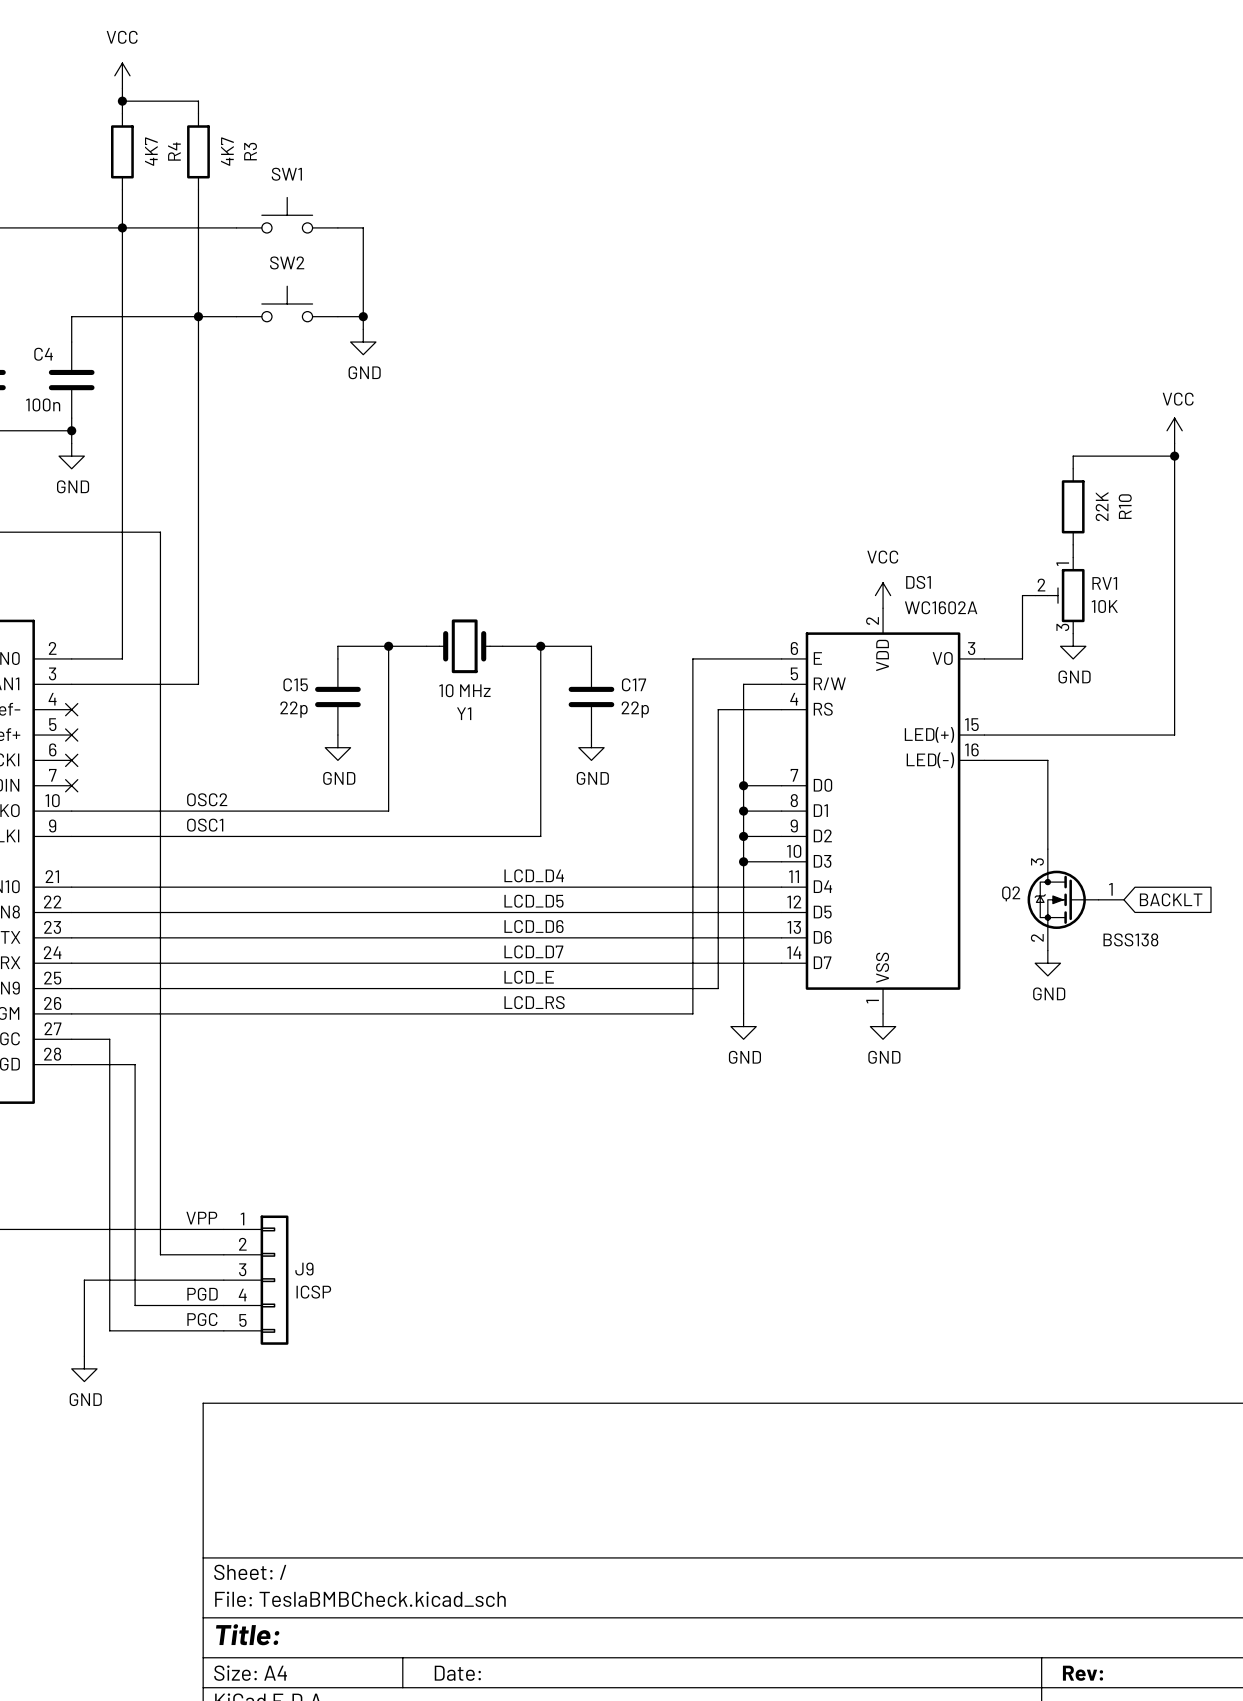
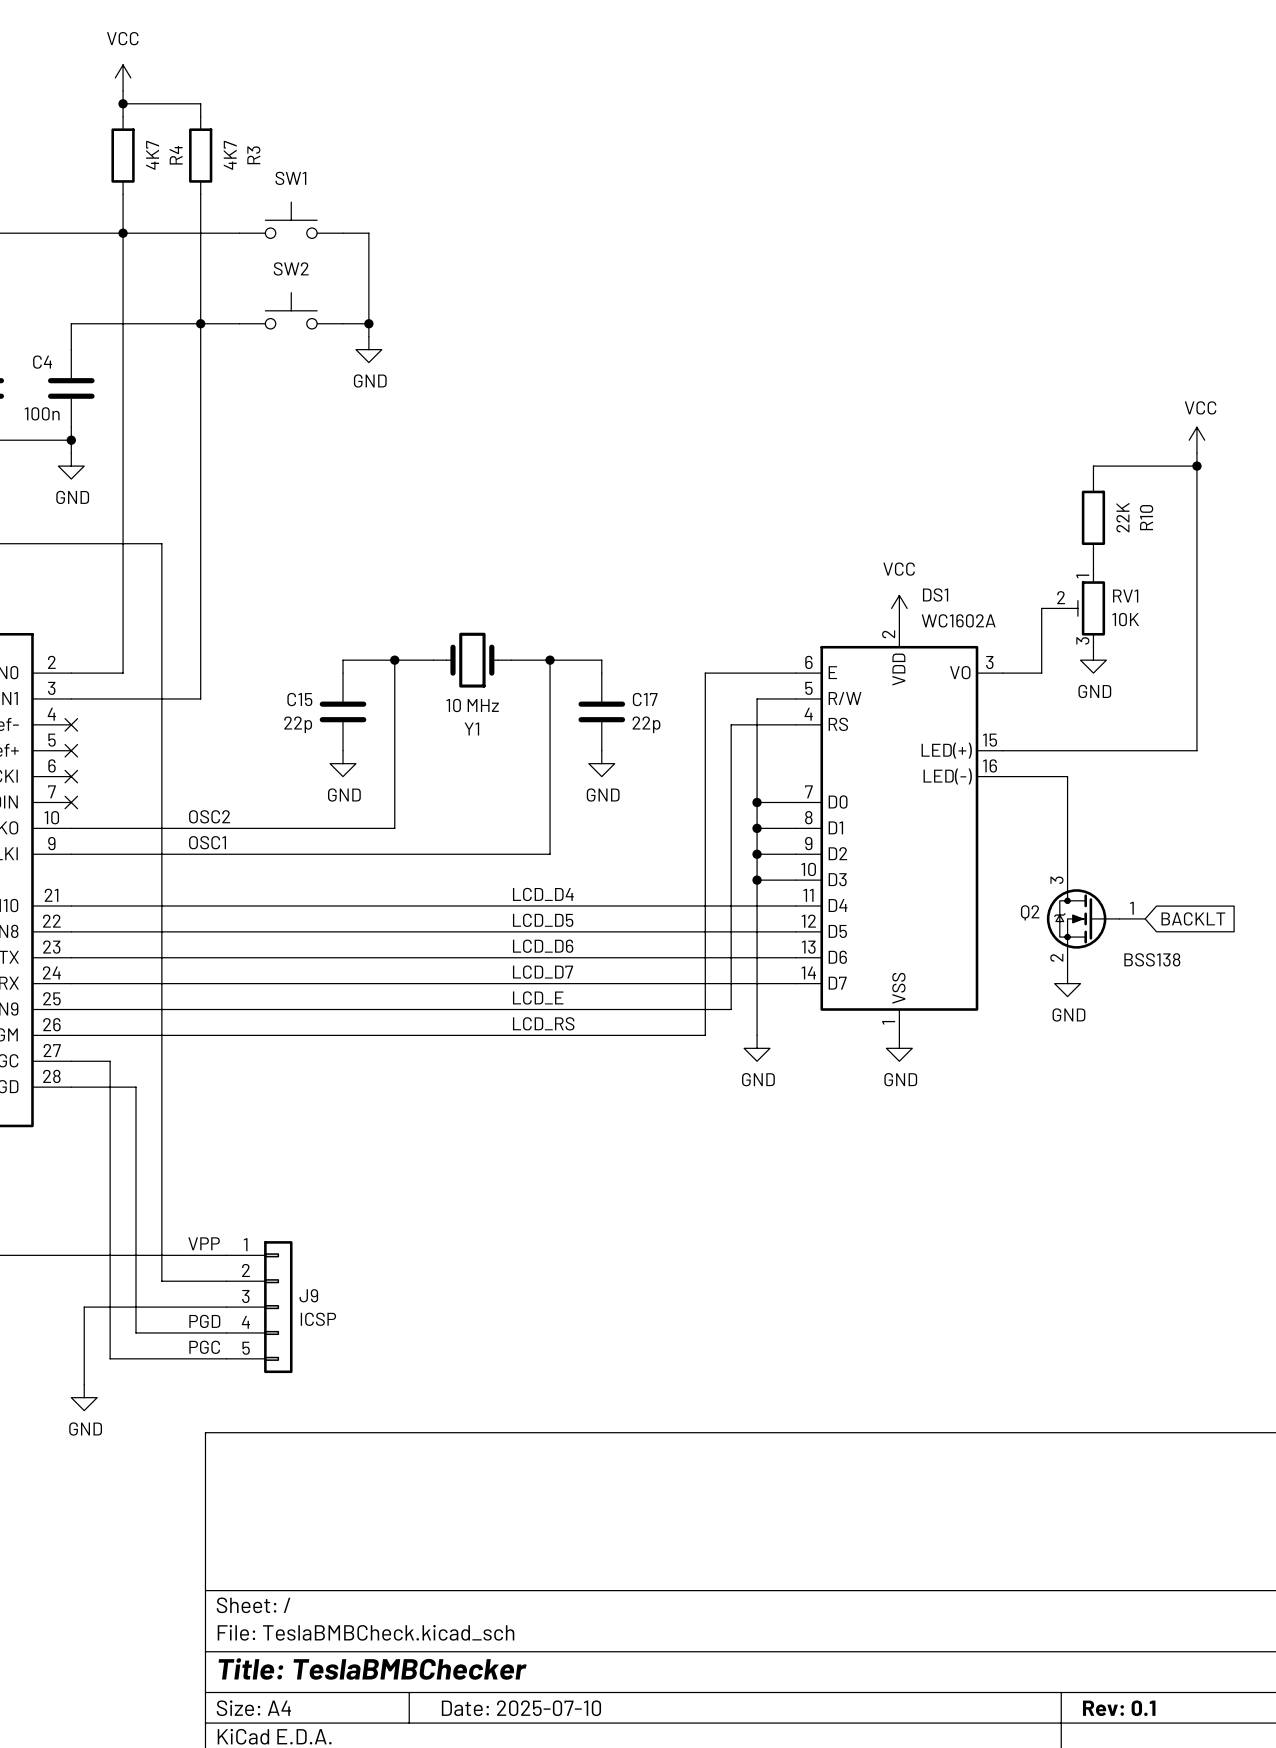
title block: Title: (247, 1634) -> Title: TeslaBMBChecker (372, 1669)
title block: Date: (457, 1673) -> Date: 2025-07-10 (521, 1708)
title block: Rev: (1083, 1673) -> Rev: 0.1 (1119, 1708)

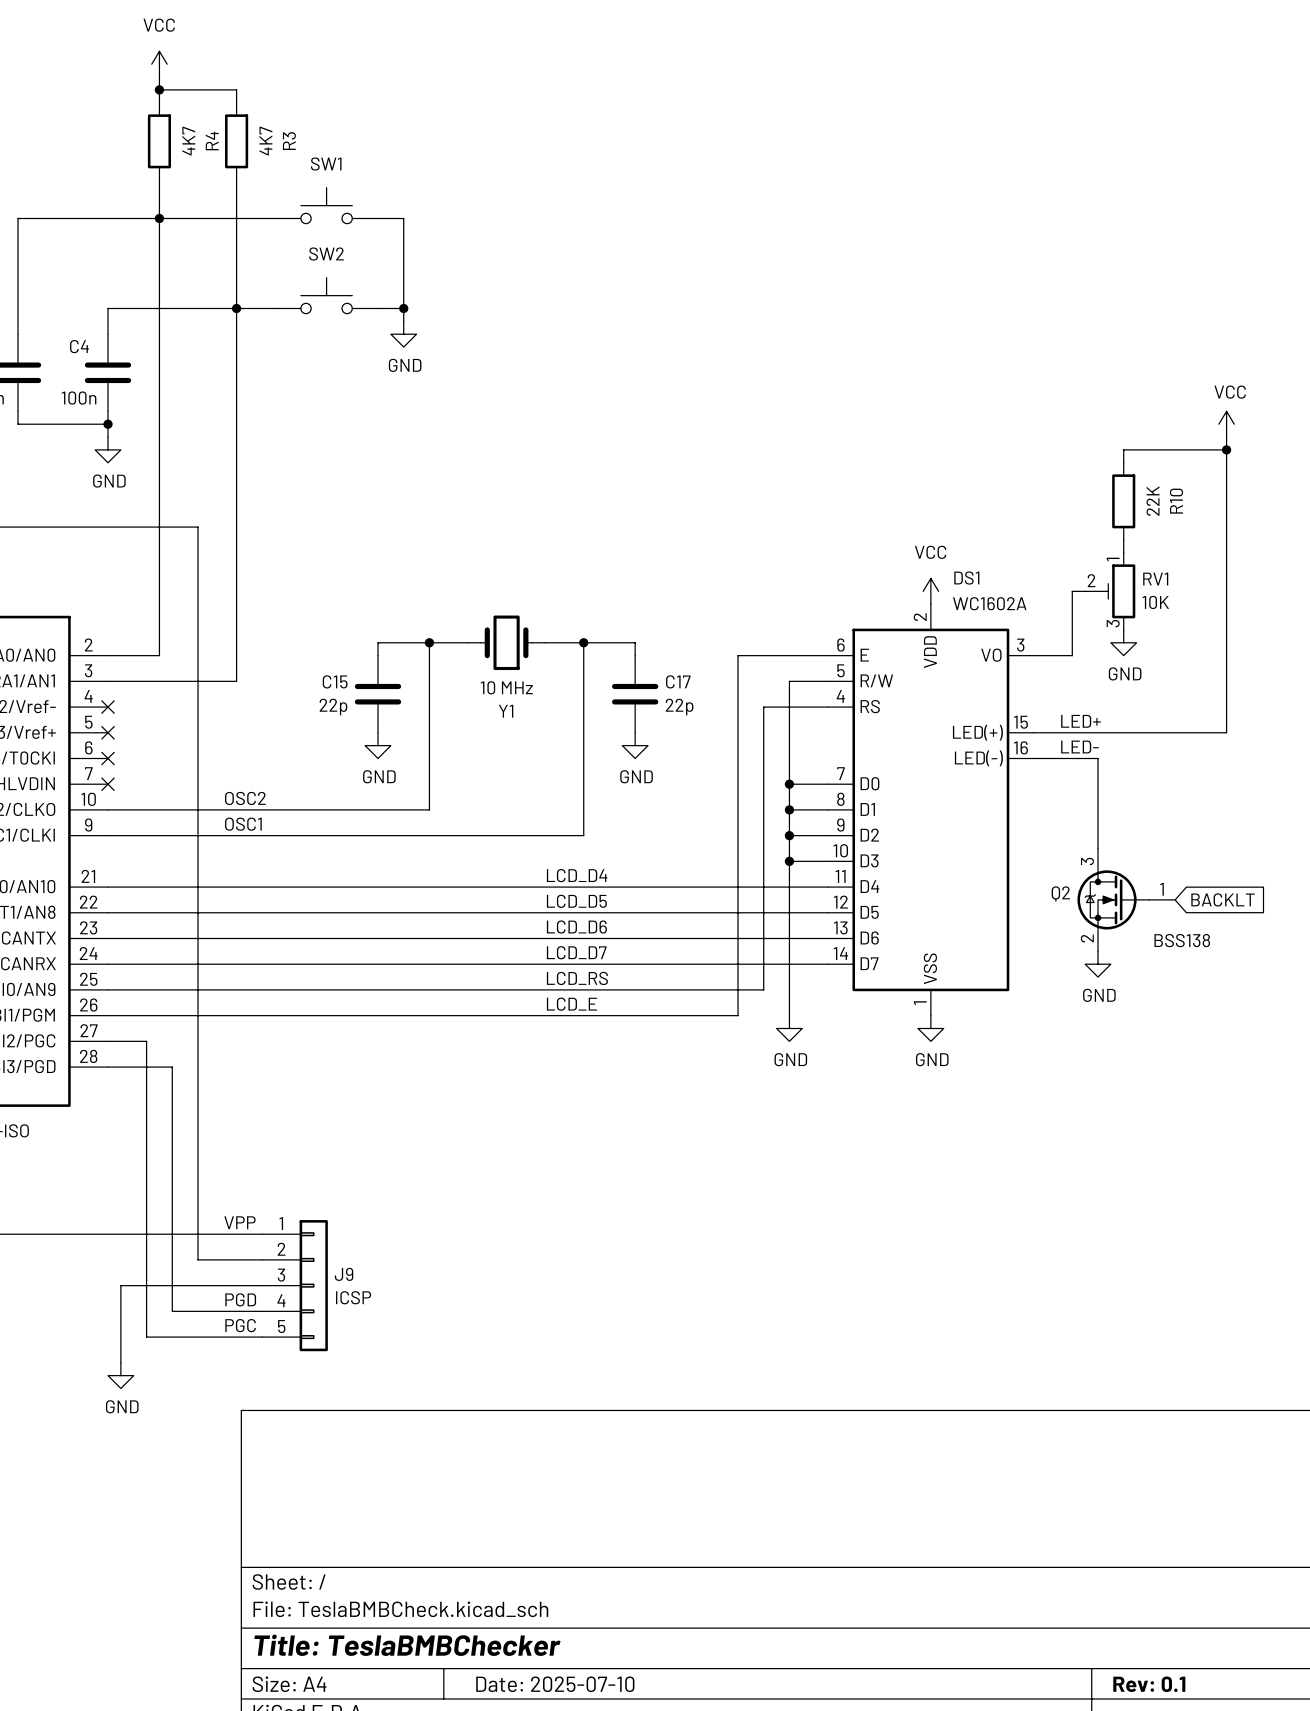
label: none -> LED+ (1080, 721)
label: none -> LED- (1080, 747)
label: LCD_E (538, 997) -> LCD_RS (577, 978)
label: LCD_RS (543, 1023) -> LCD_E (571, 1004)

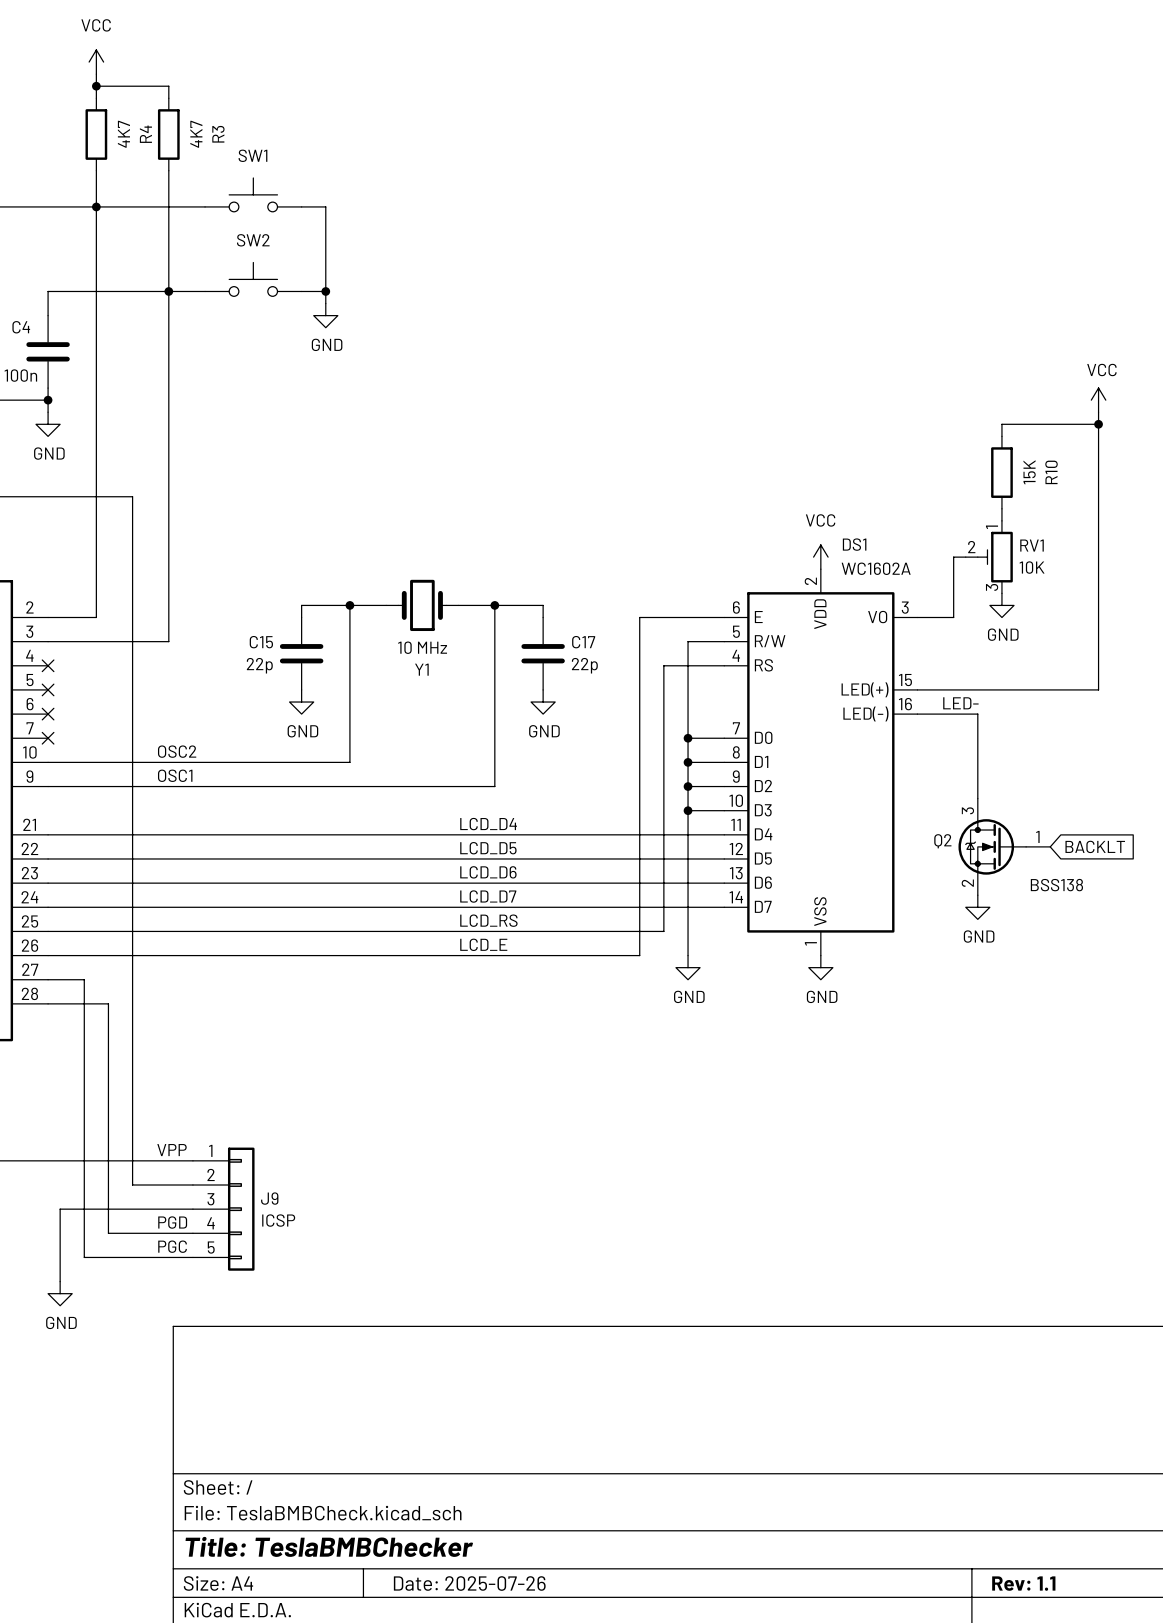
R10 value: 22K (1153, 501) -> 15K (1029, 472)
label: LED+ (1080, 721) -> none
title block: Date: 2025-07-10 (555, 1684) -> Date: 2025-07-26 (469, 1583)
title block: Rev: 0.1 (1149, 1684) -> Rev: 1.1 (1023, 1583)

